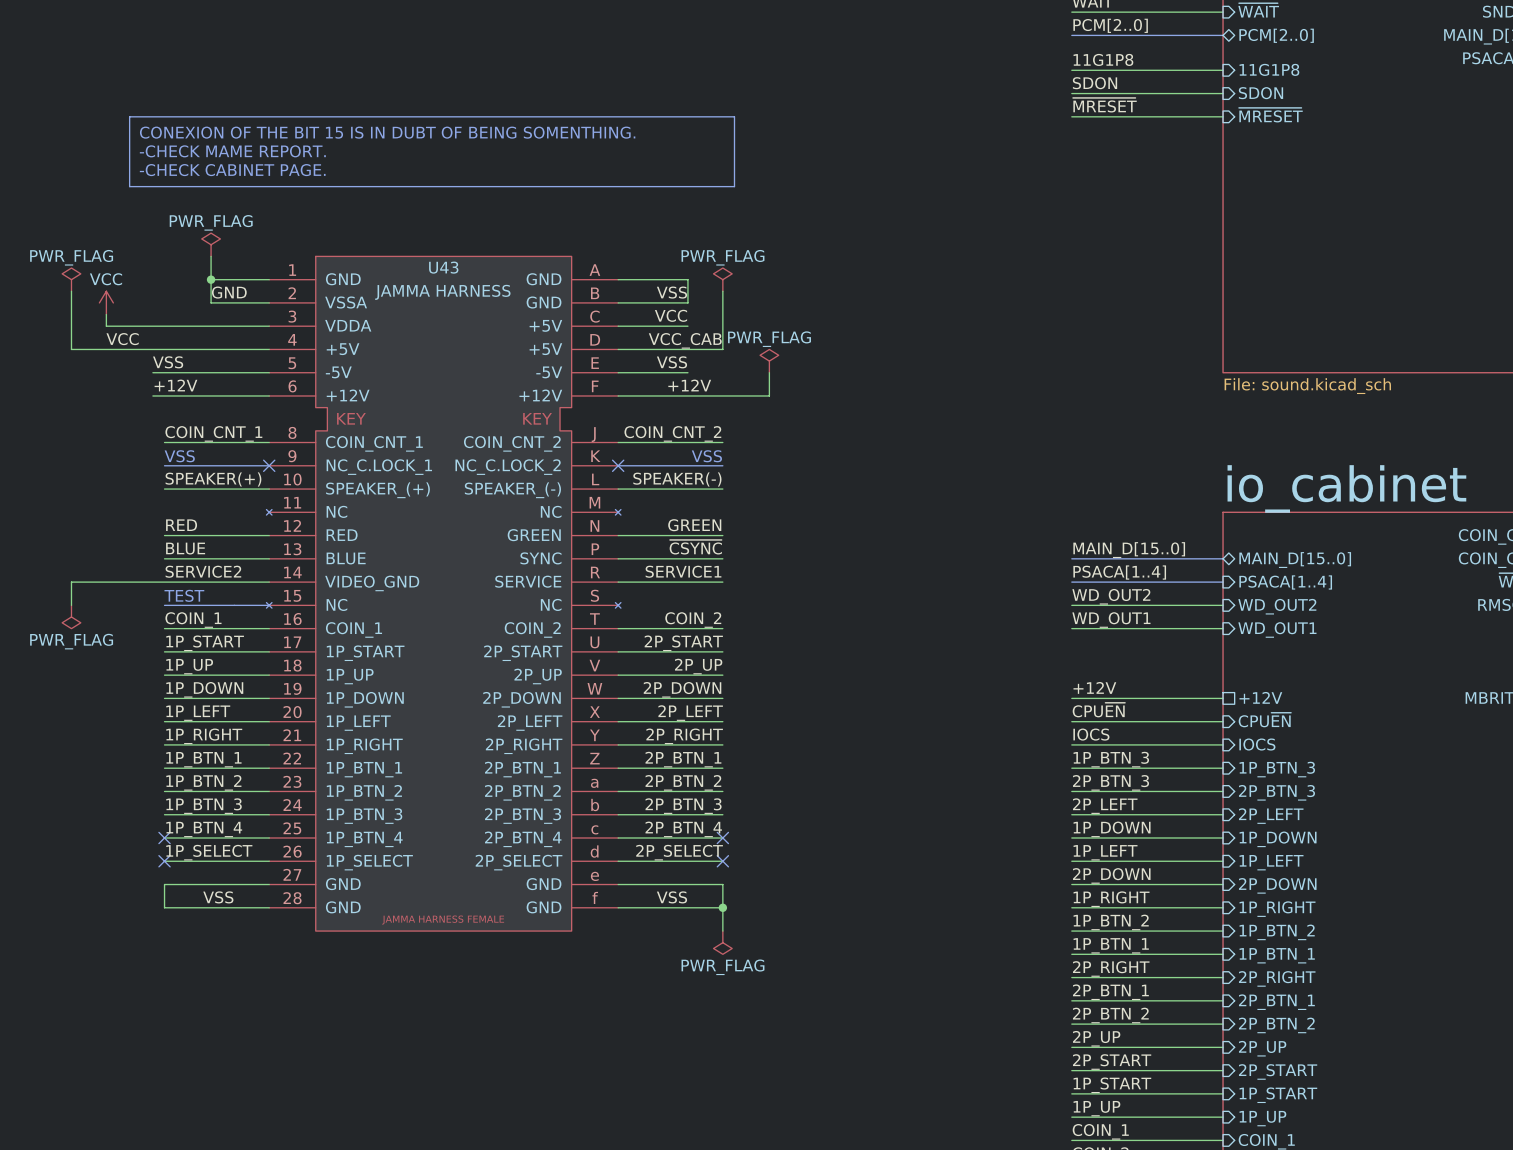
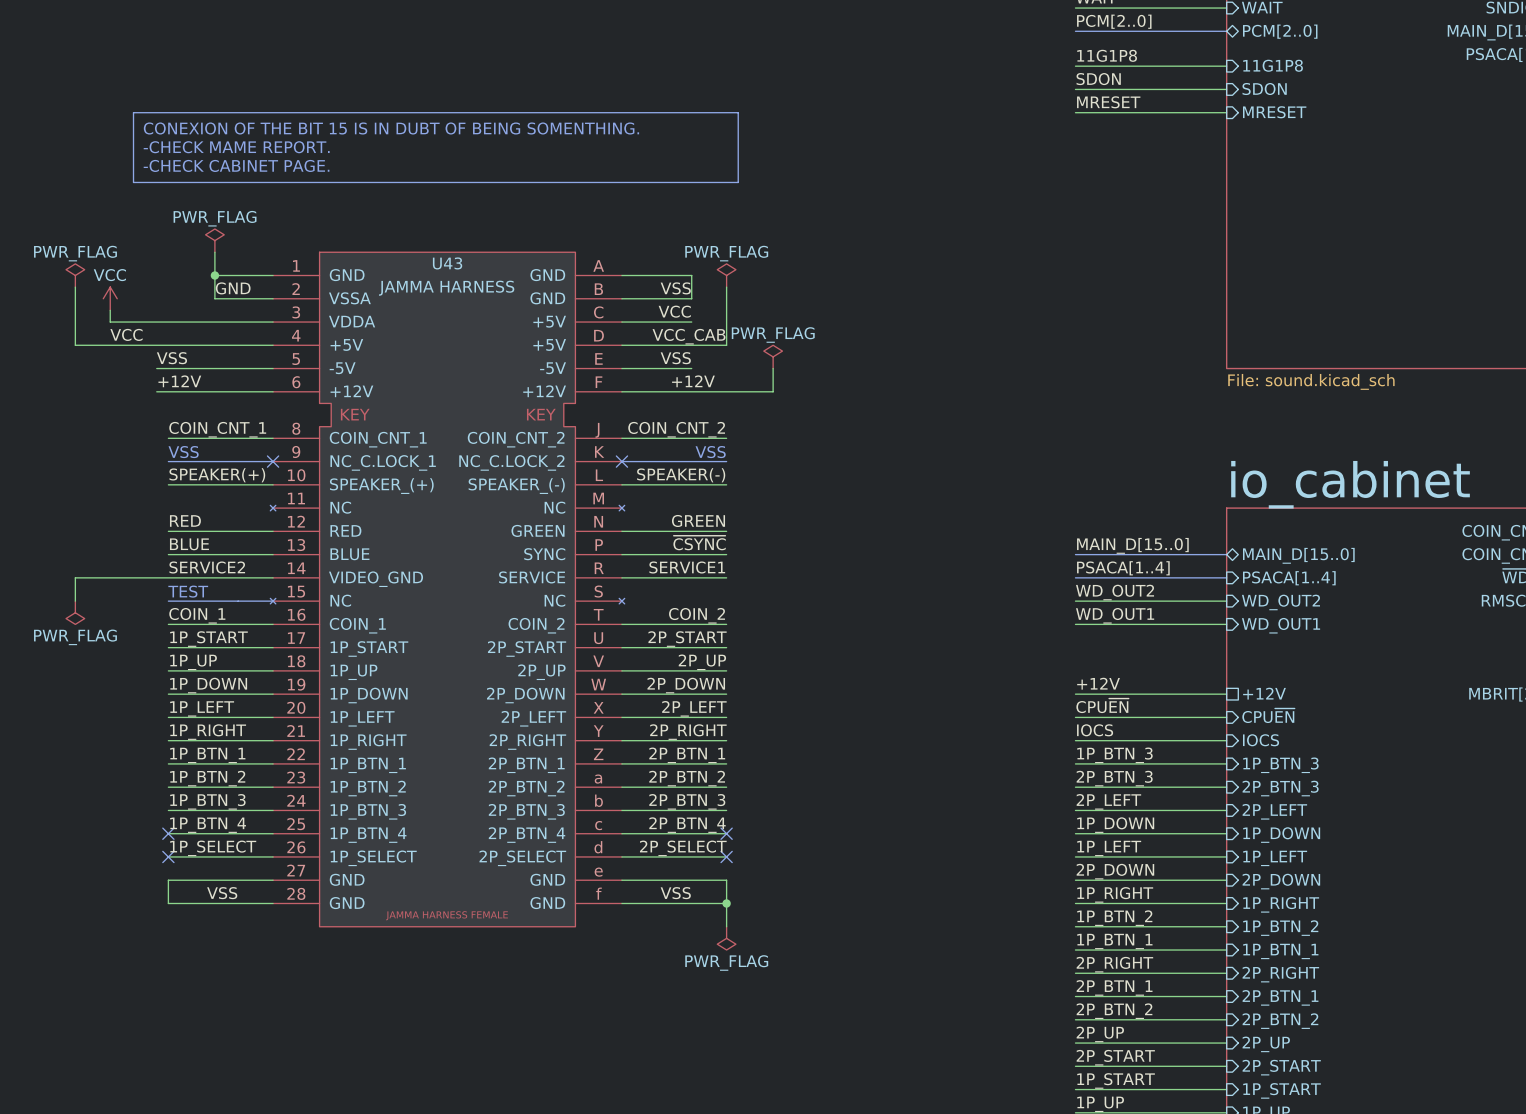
label: ~{MRESET} (1104, 105) -> MRESET (1108, 102)
sheet pin: ~{MRESET} (1270, 115) -> MRESET (1274, 112)

